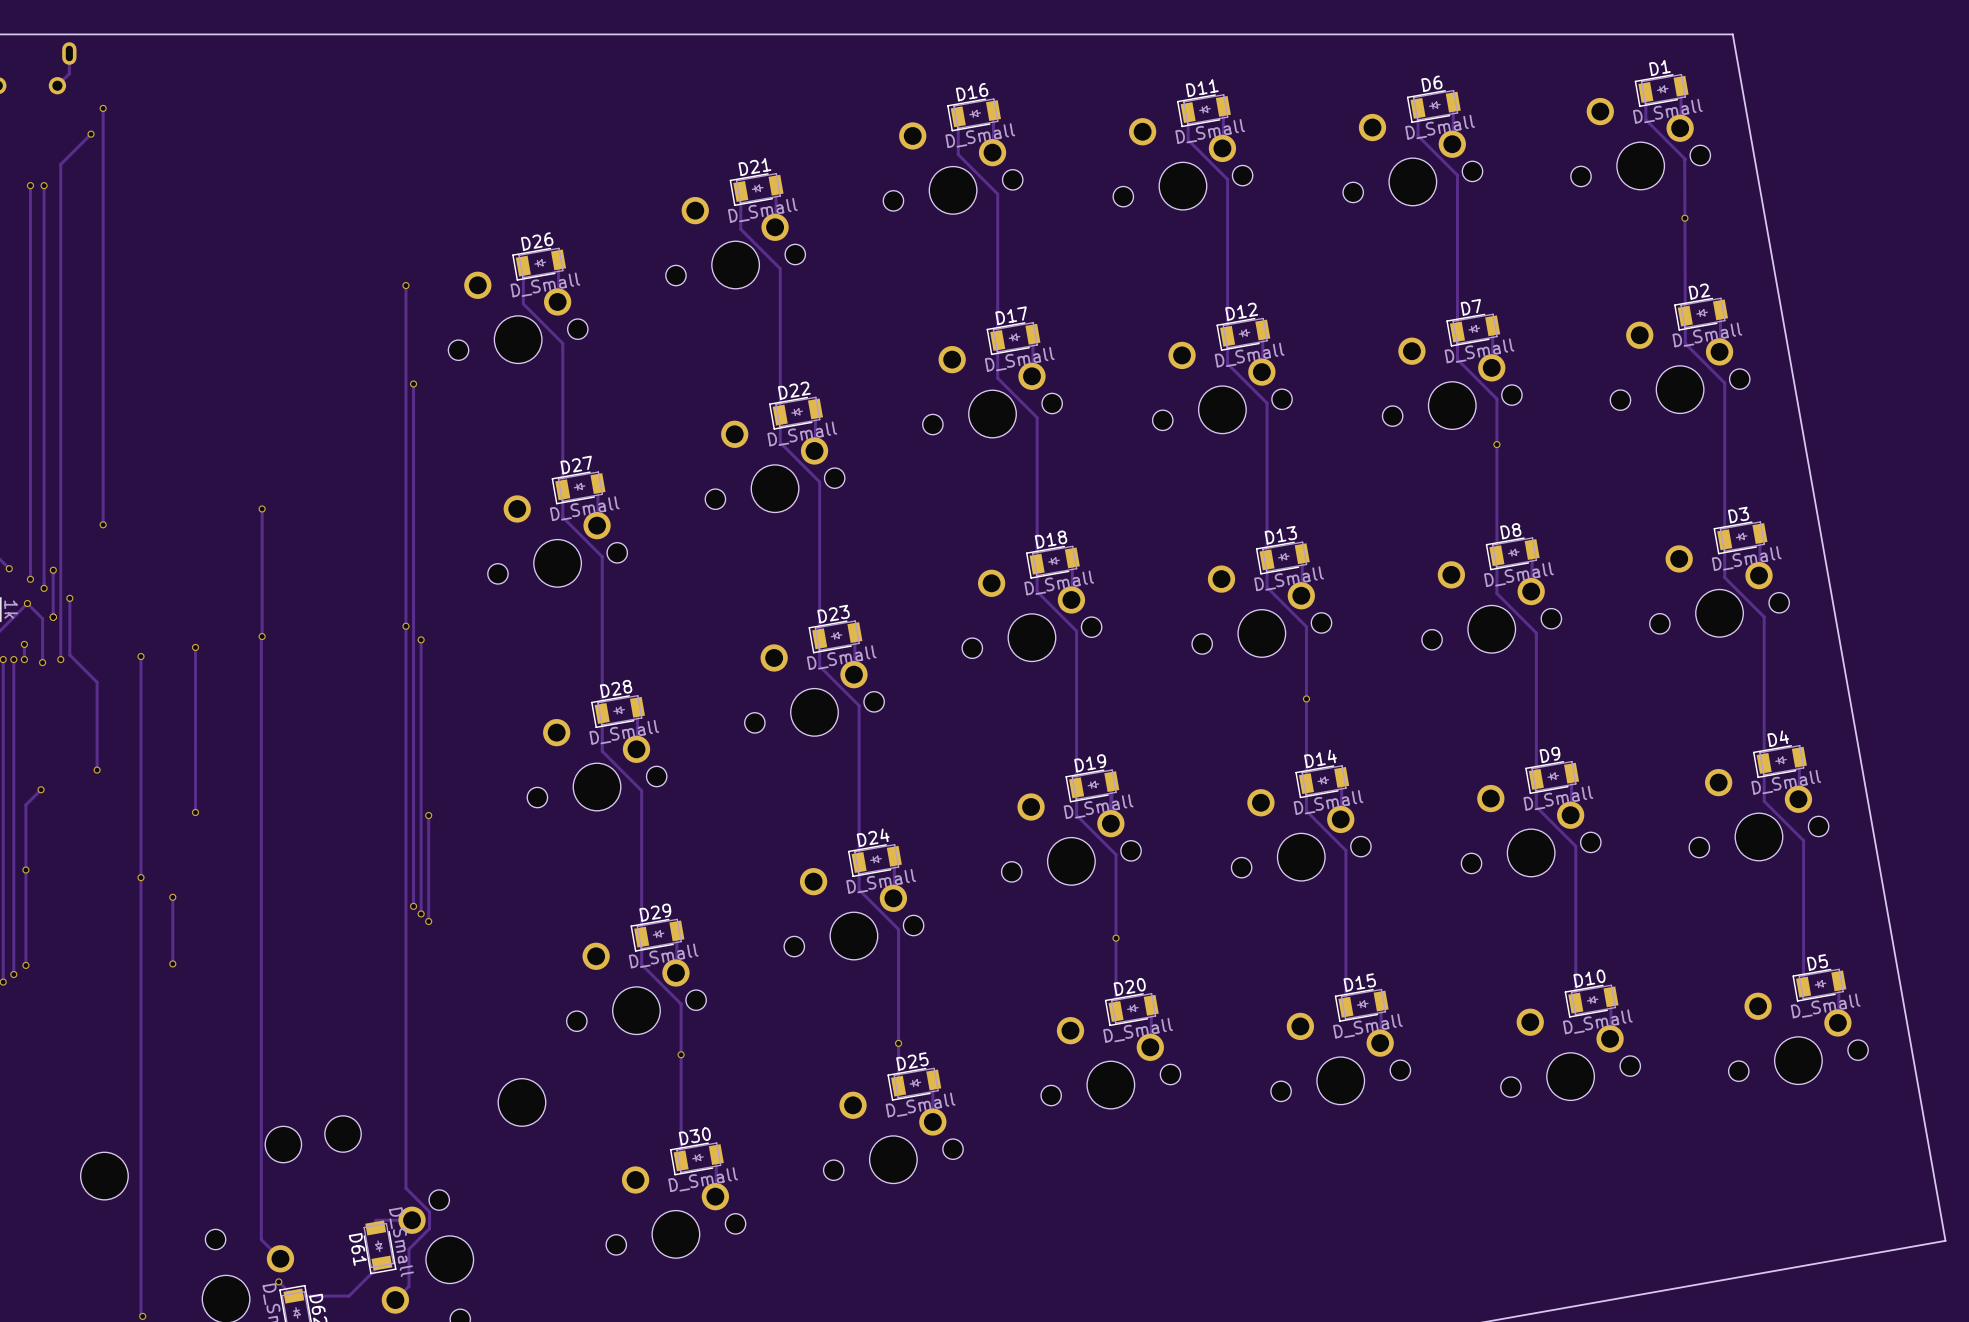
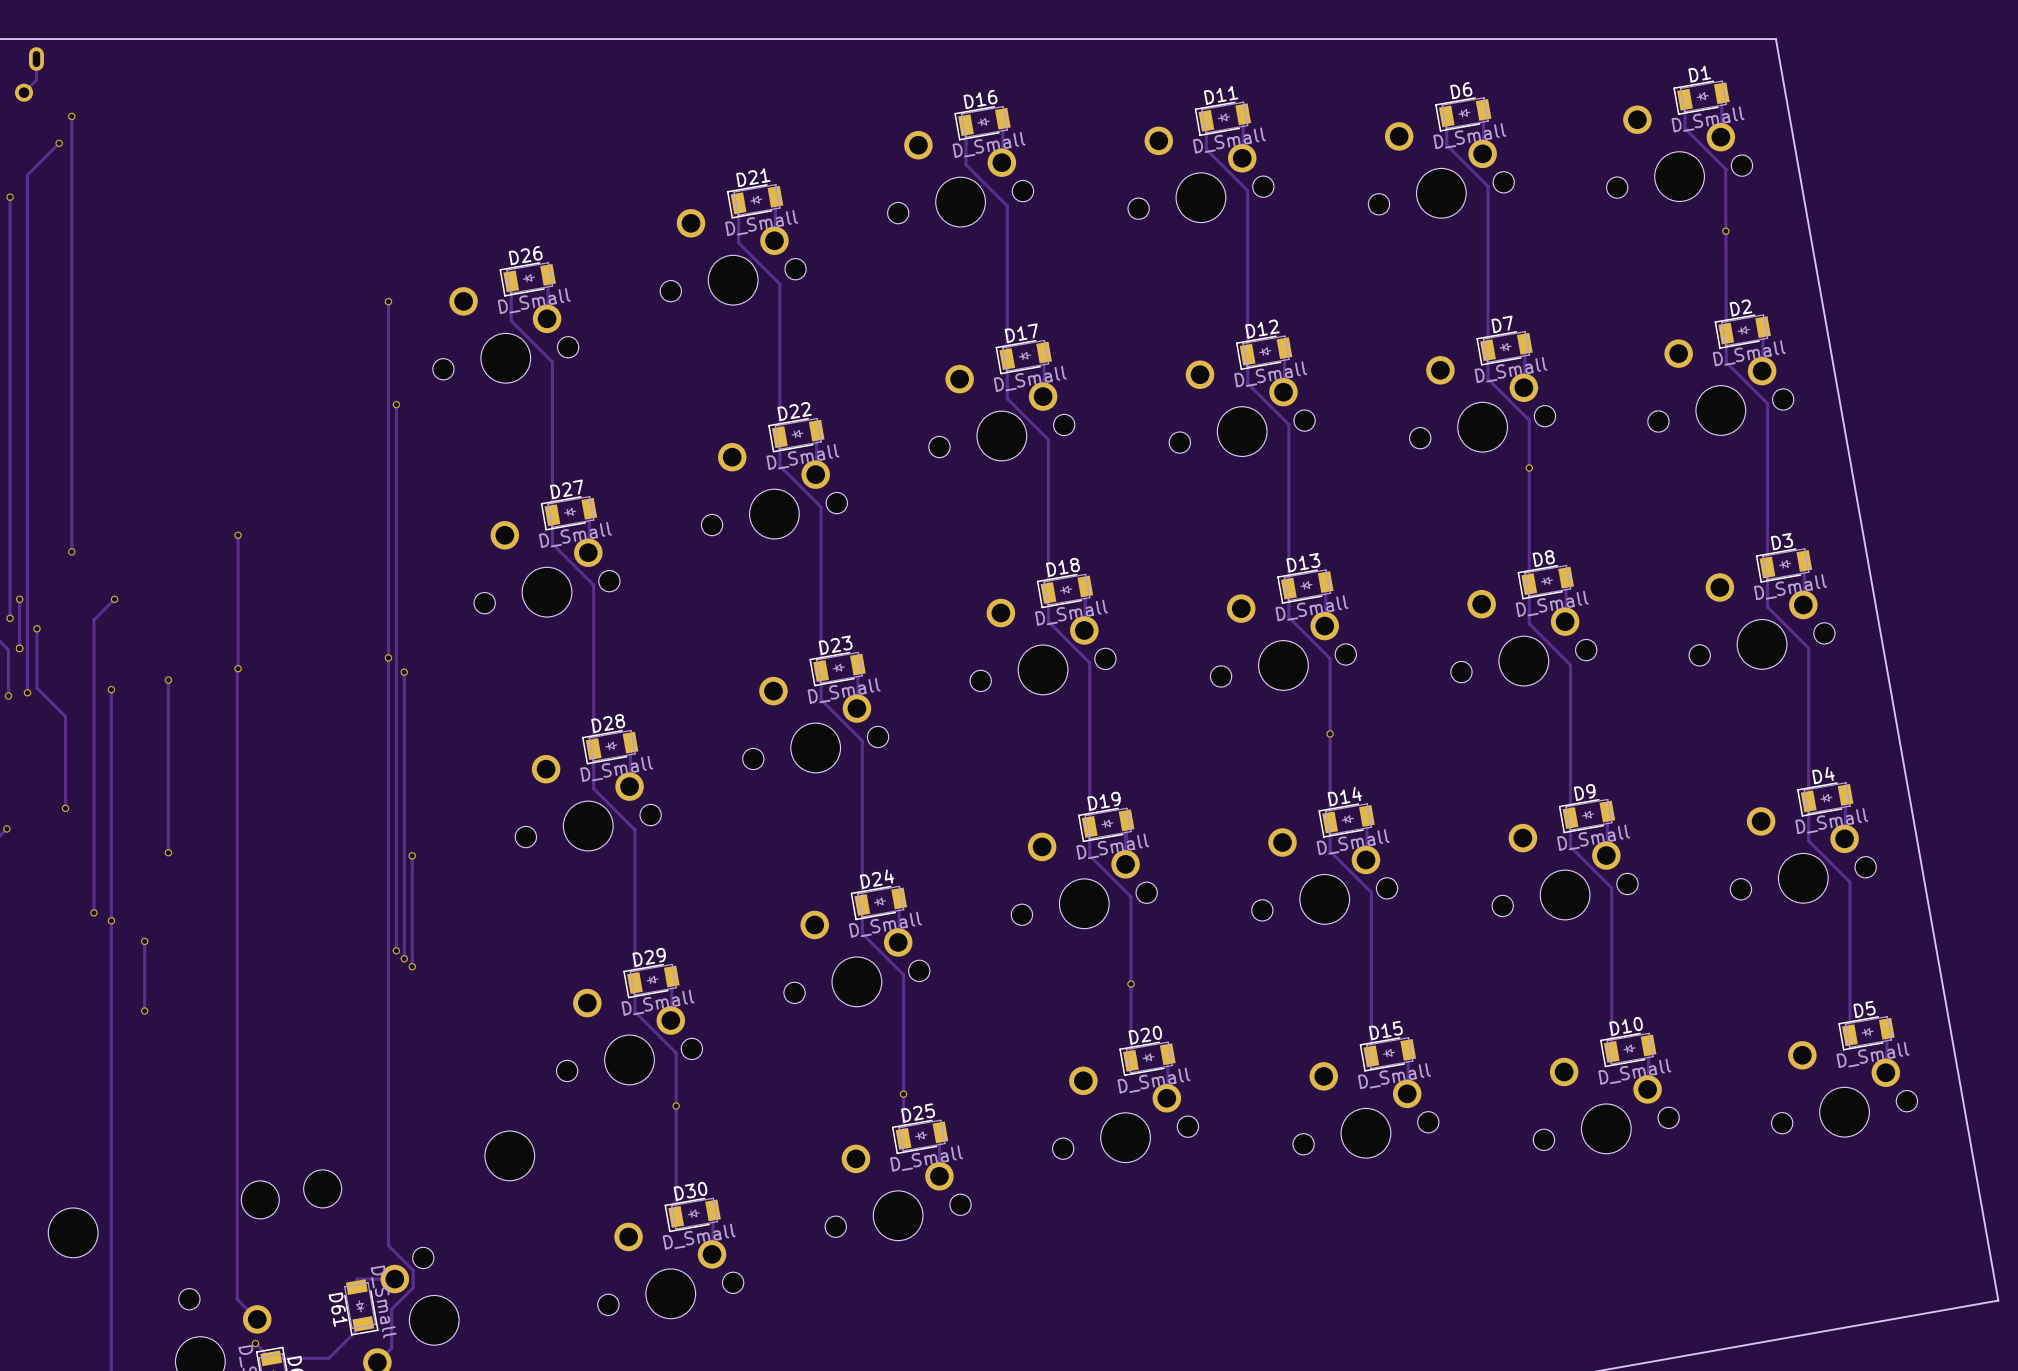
track: none -> (114, 599) (93, 619) (93, 912)
via: none -> (114, 599)
via: none -> (93, 912)

